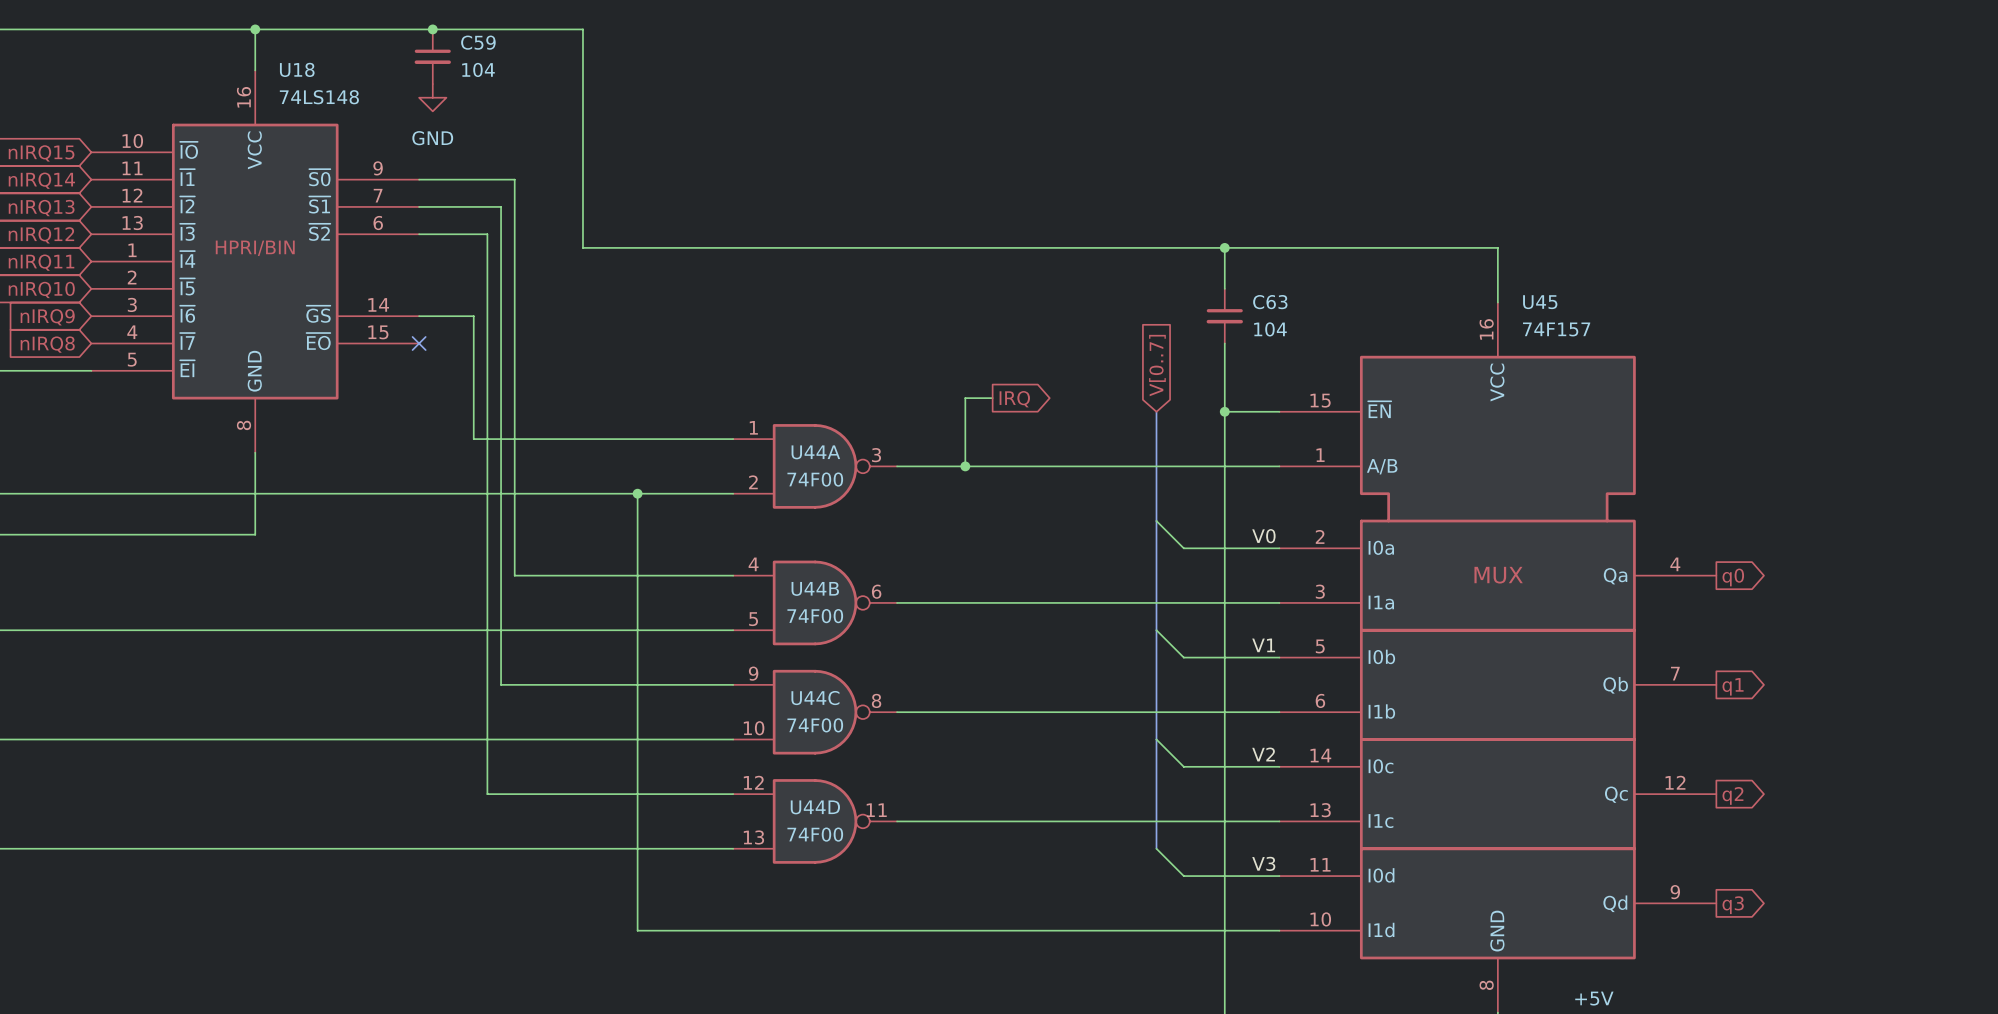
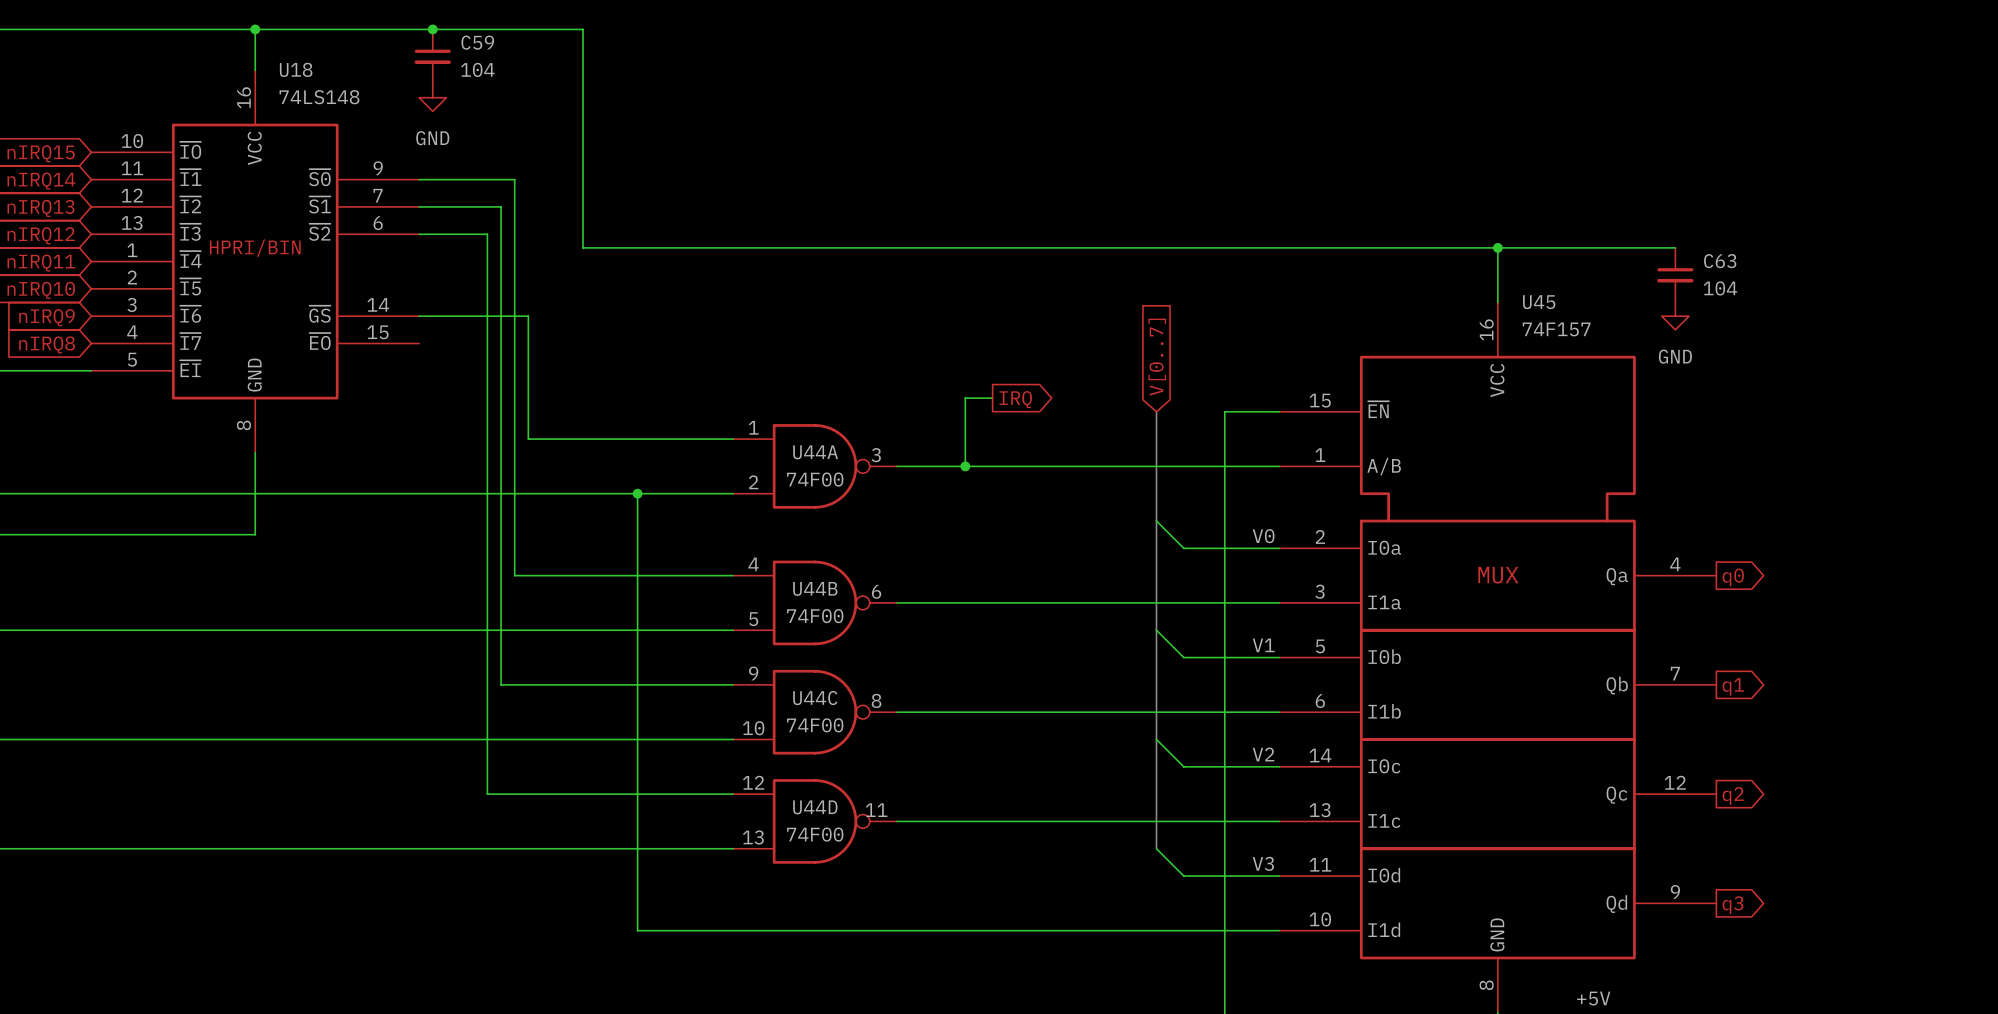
wire: (1224, 247) (1224, 288) -> none
junction: (1224, 247) -> none
wire: none -> (1497, 247) (1675, 247)
junction: none -> (1497, 247)
wire: (473, 316) (473, 439) (528, 439) -> (473, 316) (528, 316) (528, 439)
C63 position: (1224, 316) -> (1675, 275)
power symbol: none -> GND (1675, 316)
no-connect mark: (419, 343) -> none
wire: (1224, 343) (1224, 411) -> none
junction: (1224, 411) -> none

